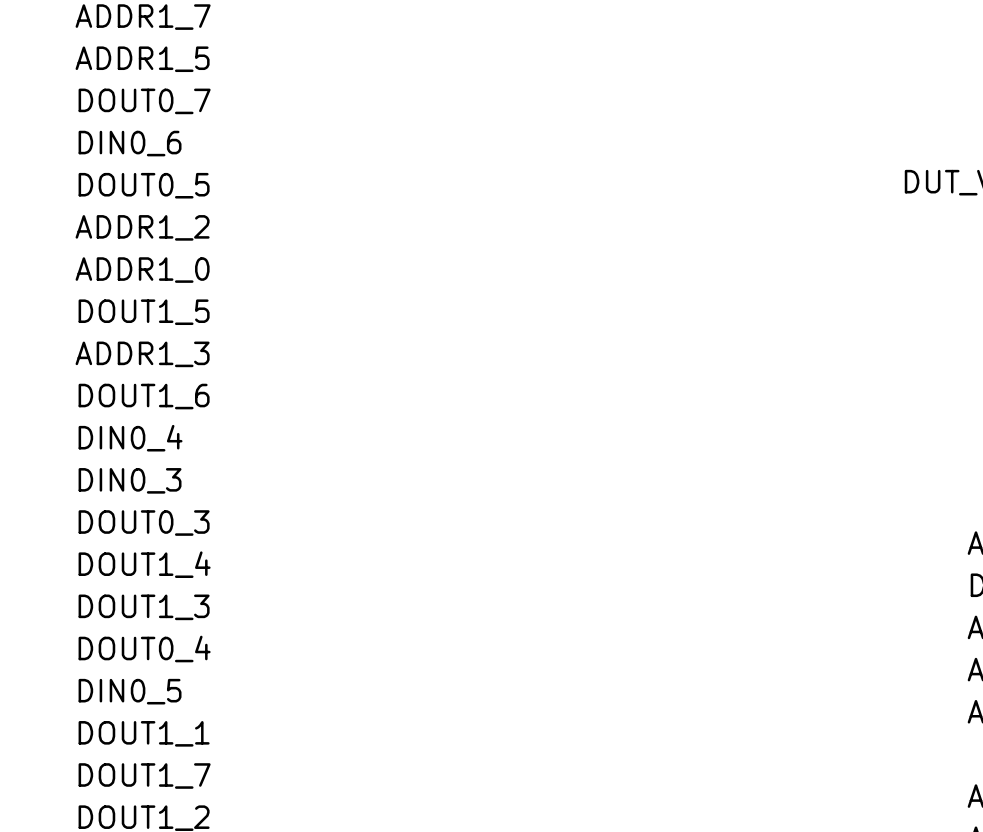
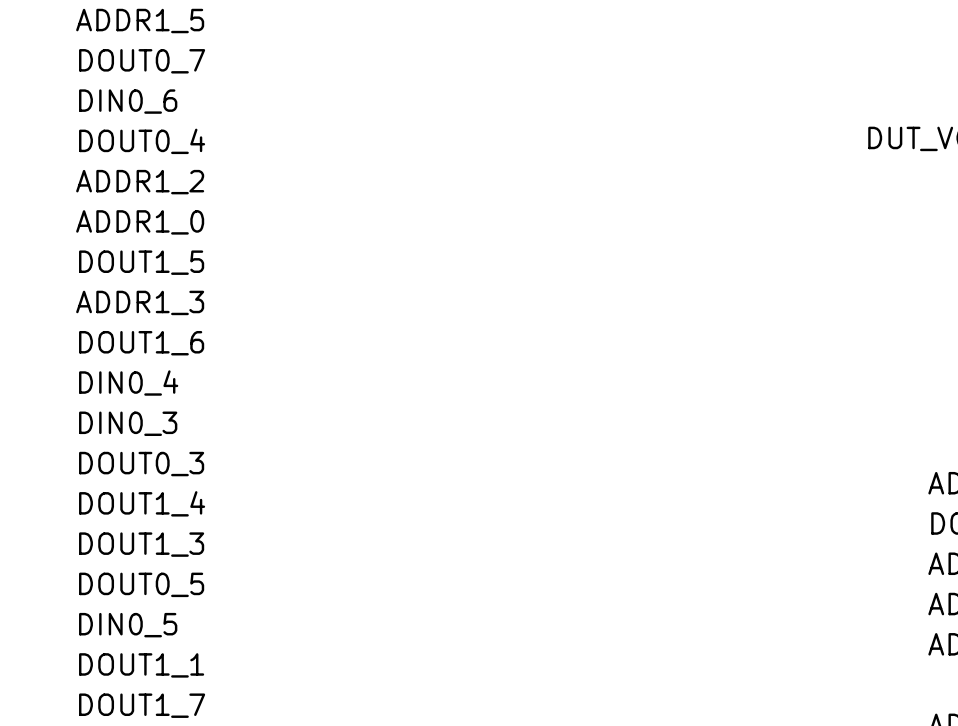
label: DOUT0_5 (144, 185) -> DOUT0_4 (142, 141)
label: DOUT0_4 (144, 649) -> DOUT0_5 (141, 584)

